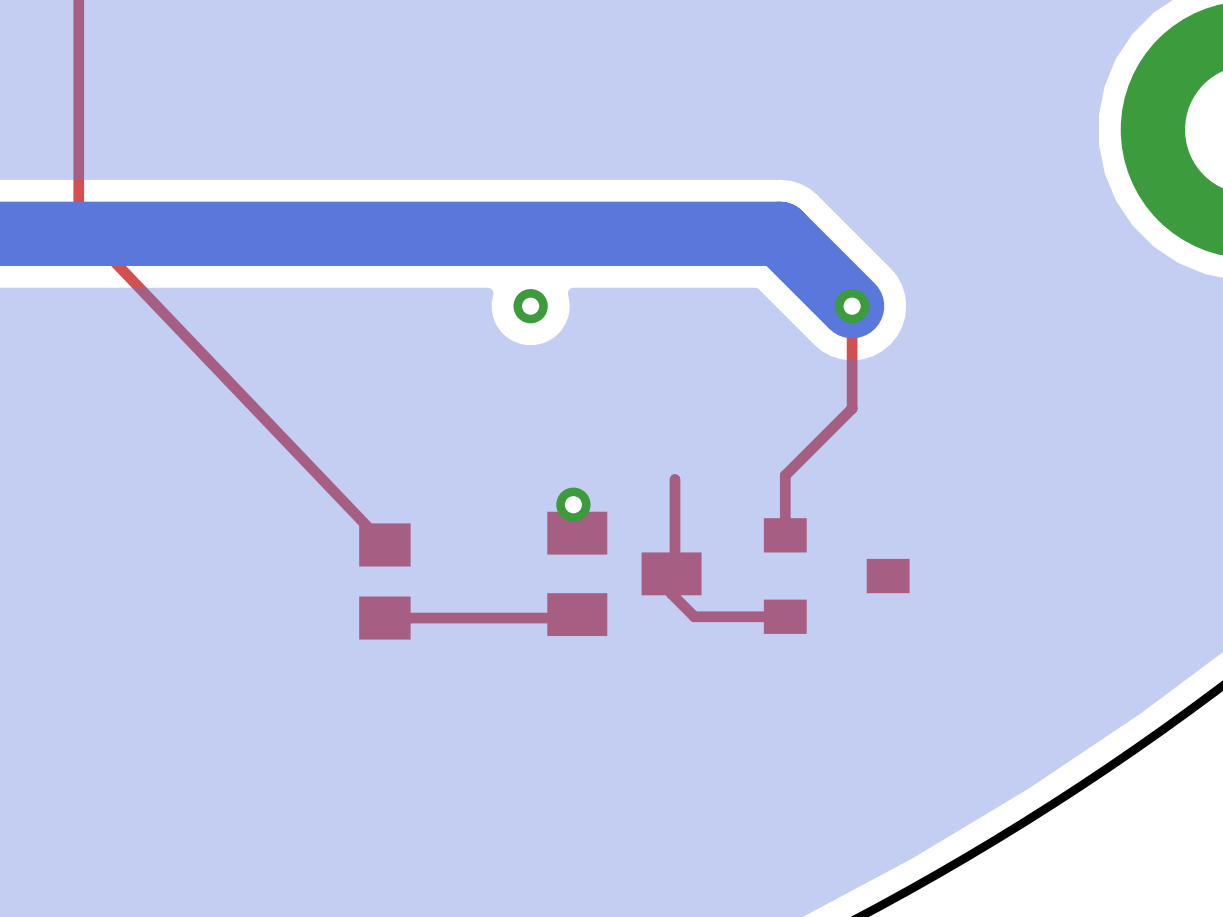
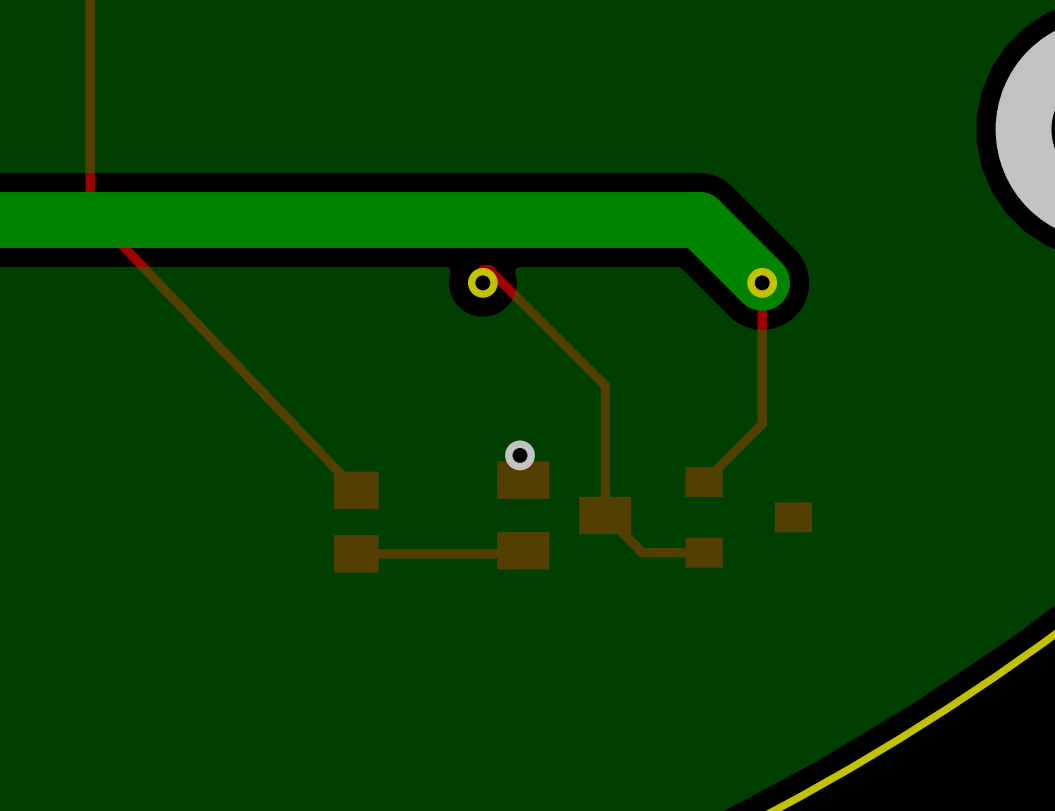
top track: (852, 408) (785, 475) (785, 535) -> (762, 371) (762, 423) (704, 481)
top track: (674, 479) (674, 570) (671, 573) (671, 593) (694, 616) (714, 616) -> (482, 269) (489, 269) (605, 385) (605, 515) (642, 552)

